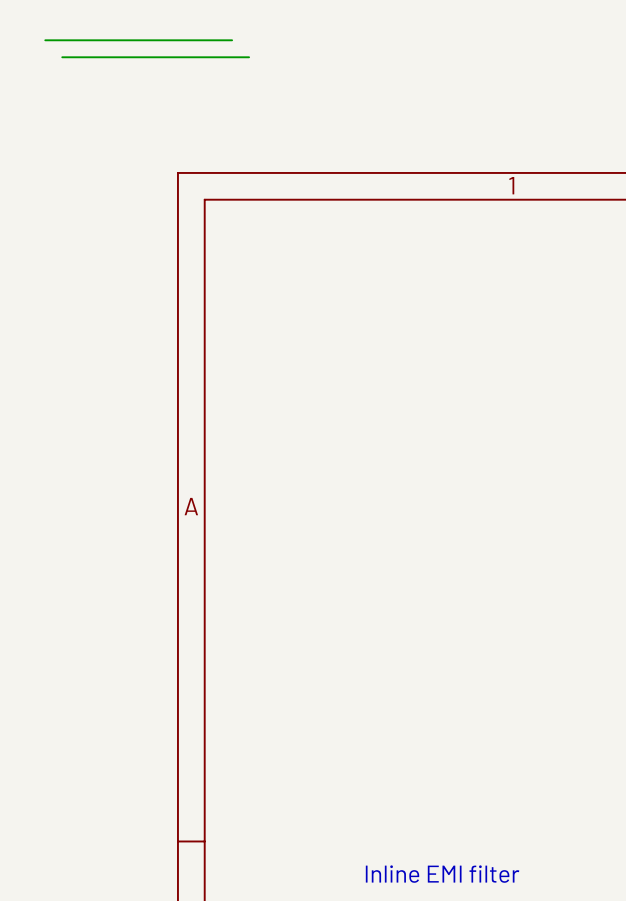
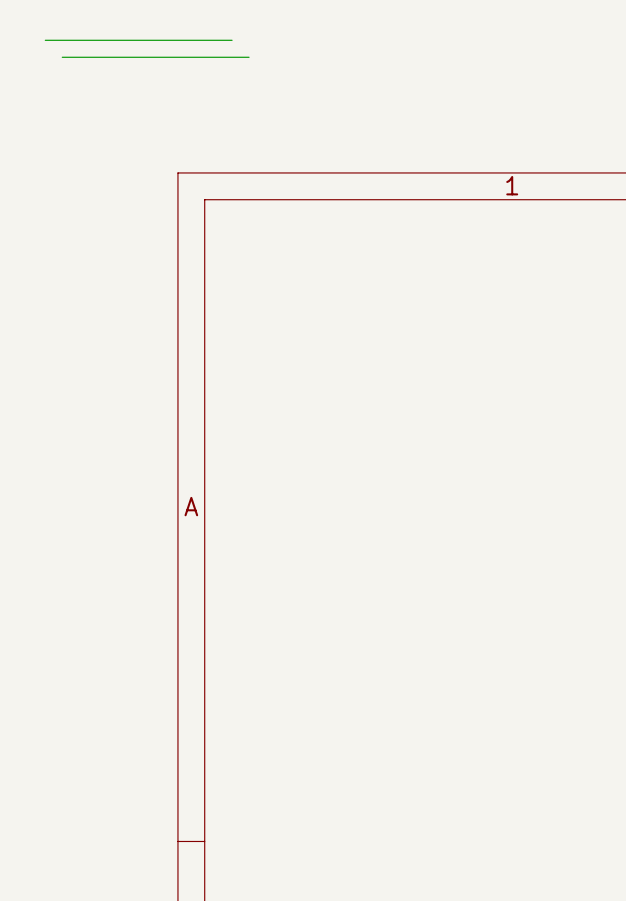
text: Inline EMI filter (442, 874) -> none

